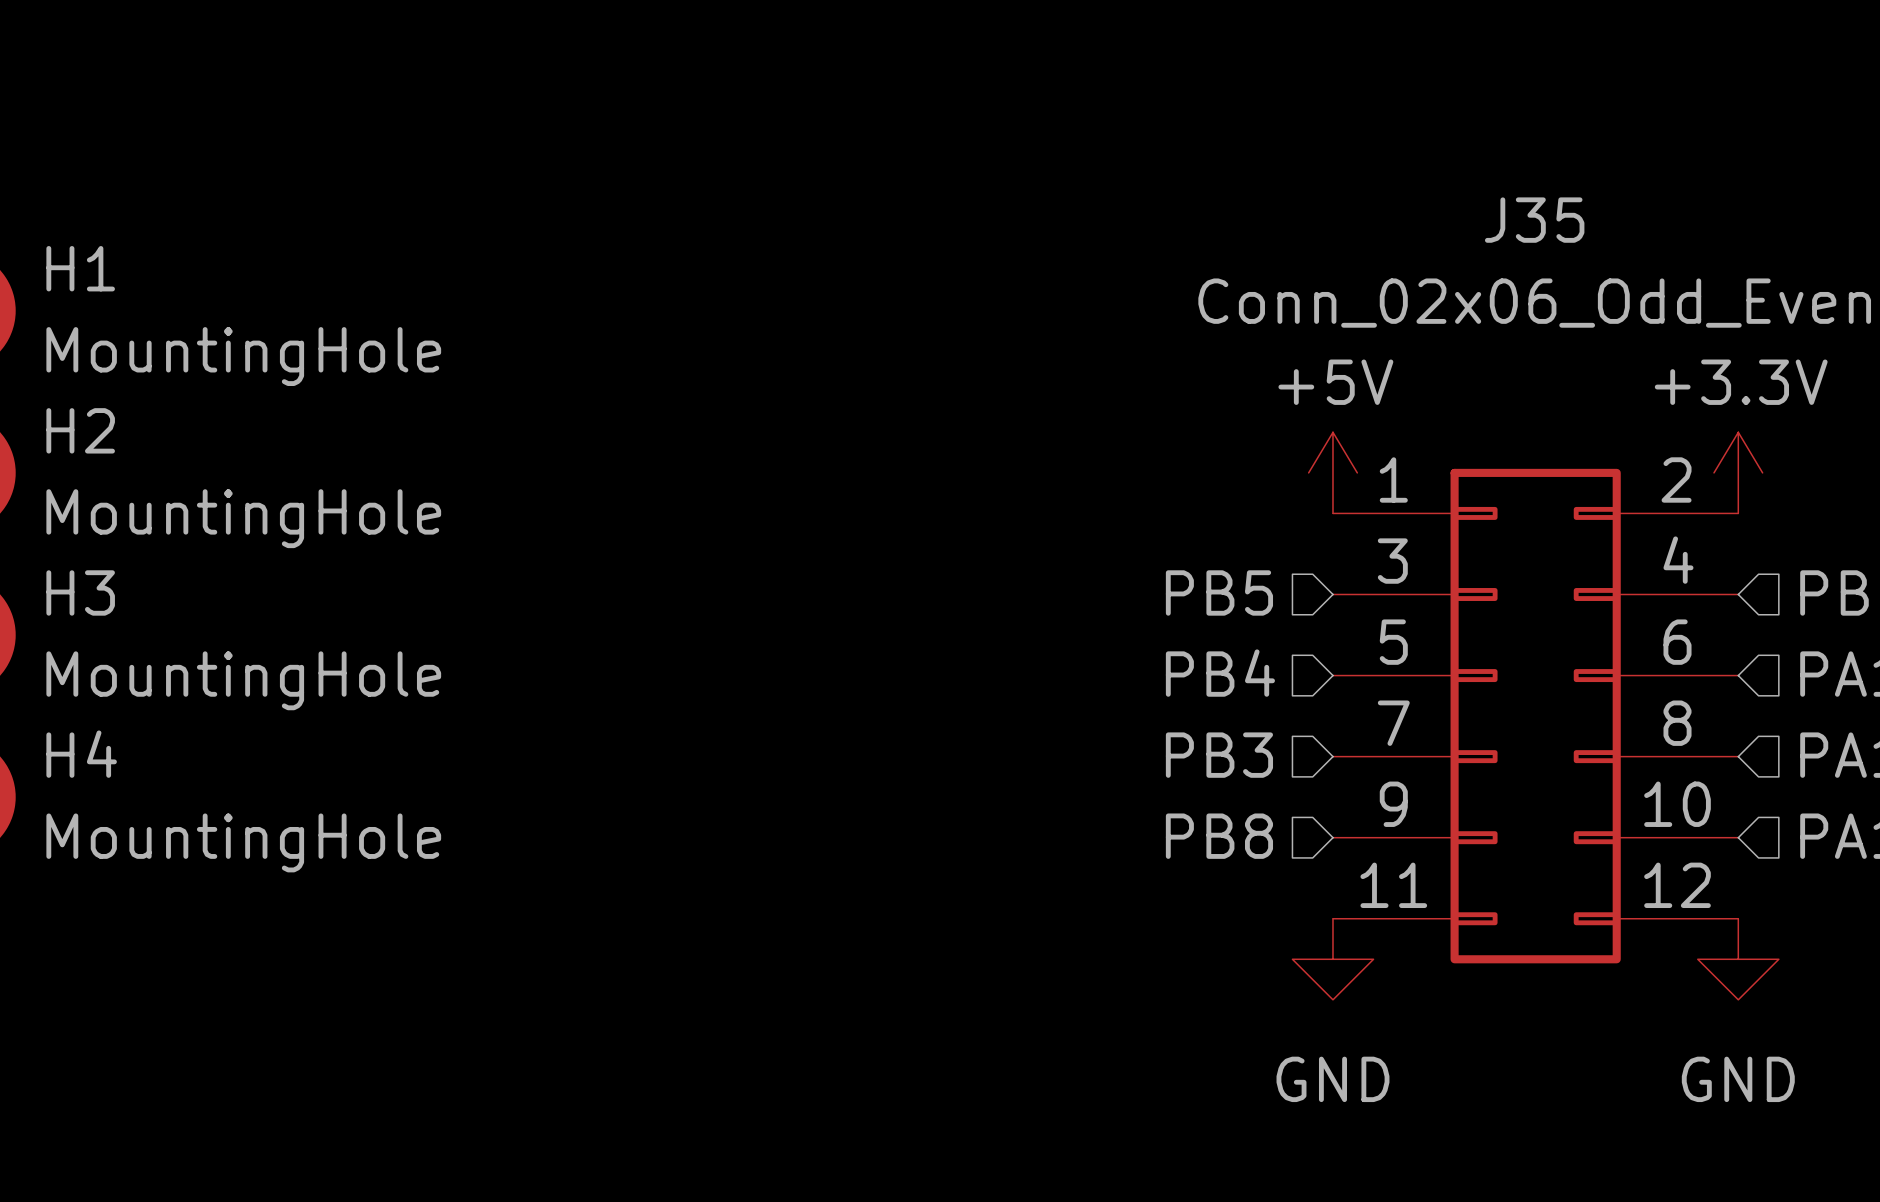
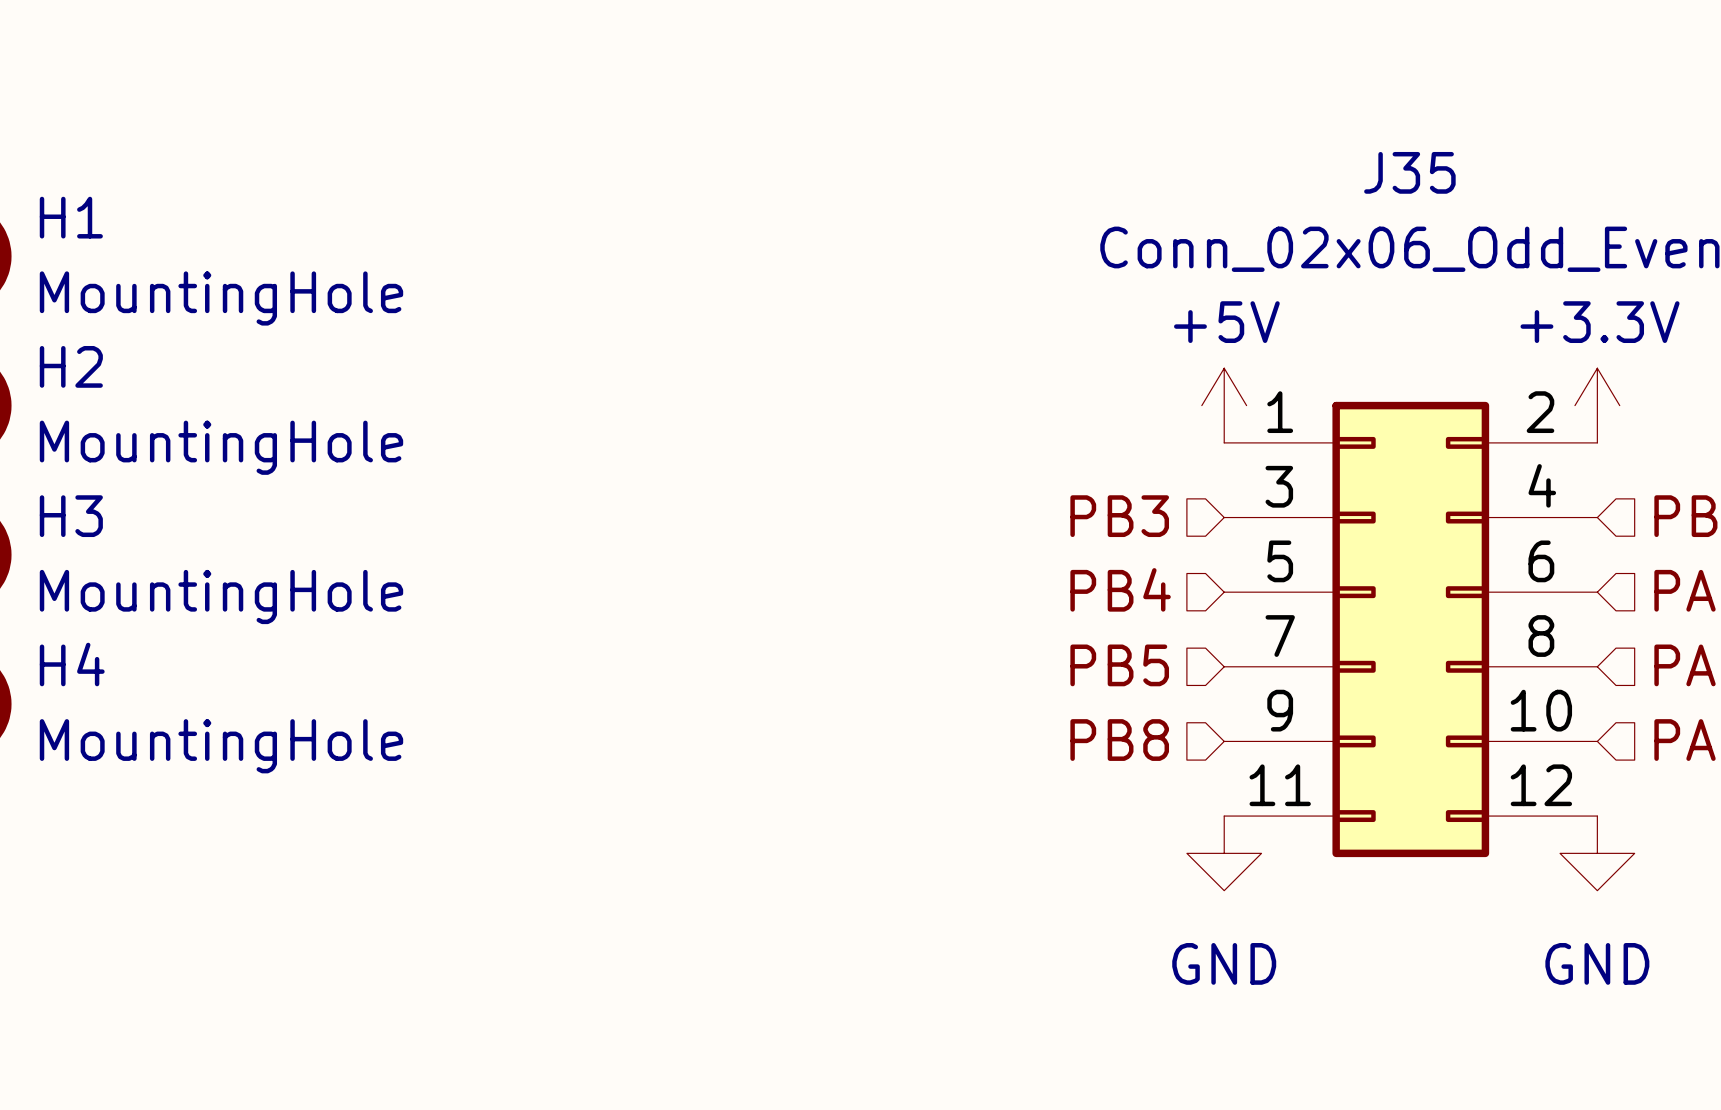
hierarchical label: PB5 (1219, 592) -> PB3 (1119, 516)
hierarchical label: PB3 (1219, 755) -> PB5 (1119, 665)

